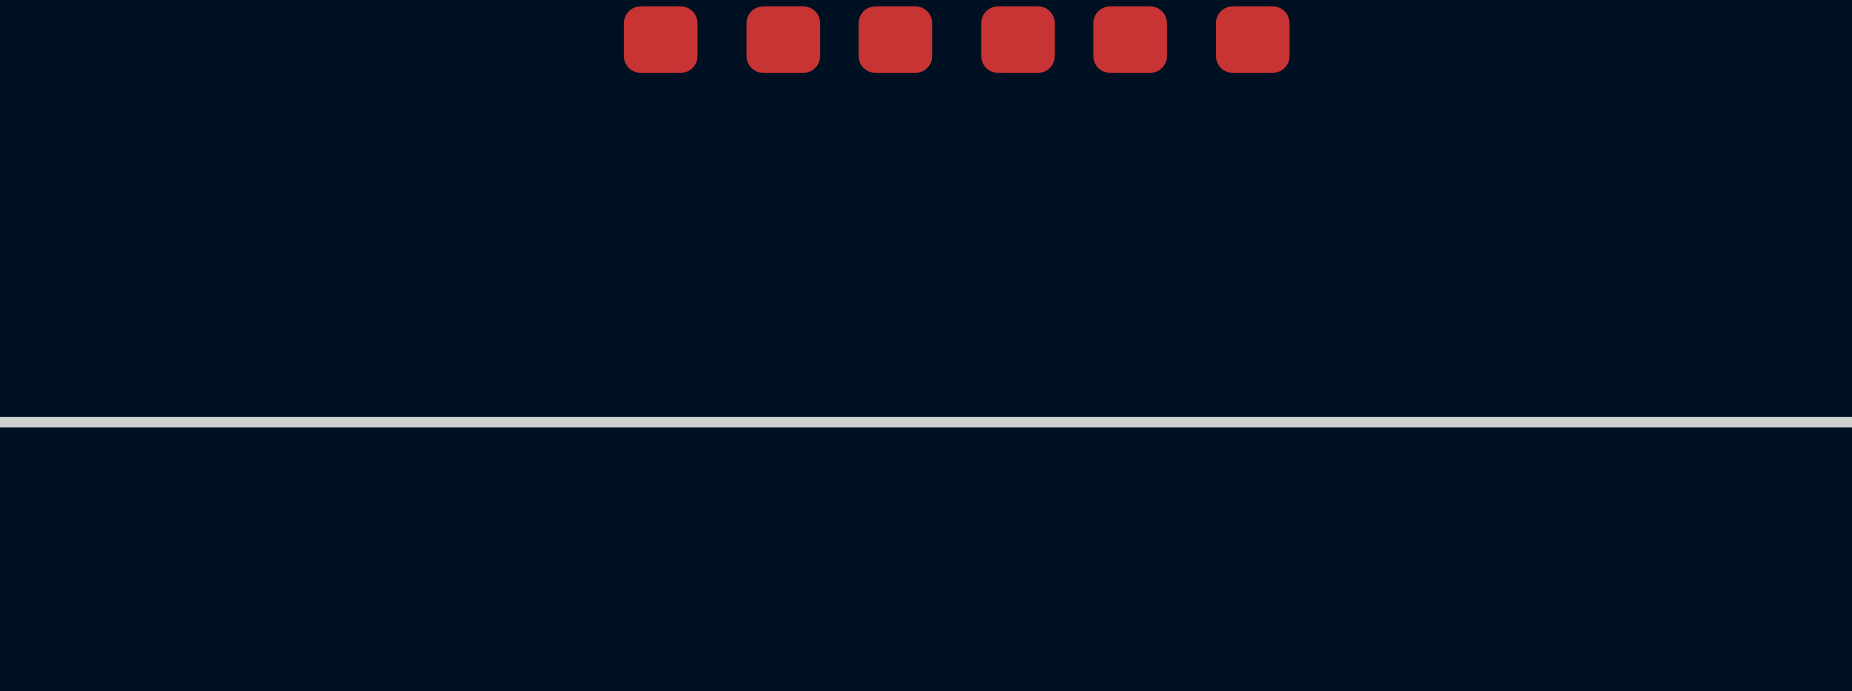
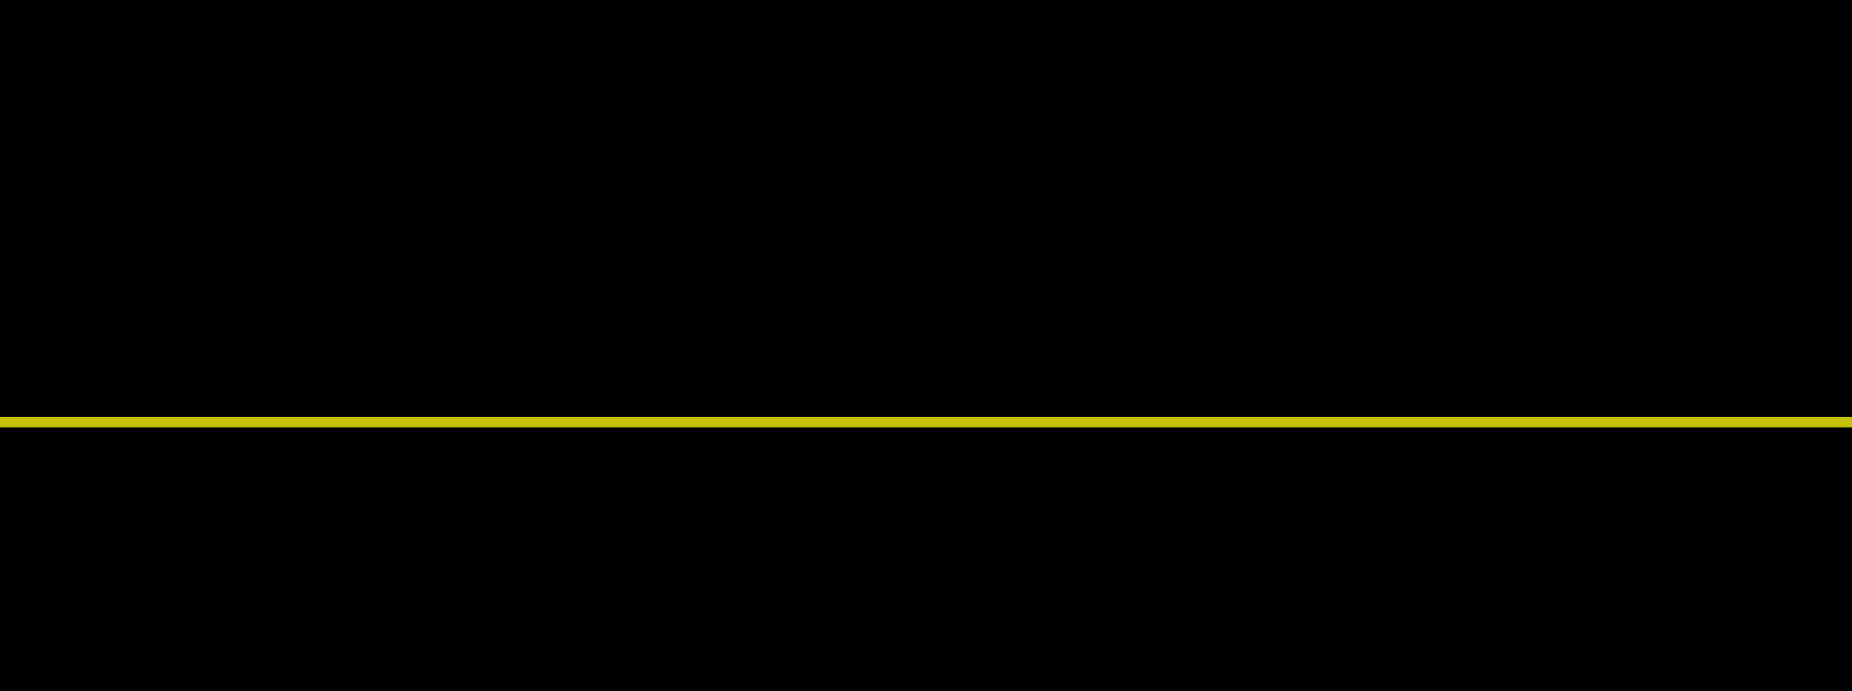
part: (722, 39) -> none
part: (956, 39) -> none
part: (1191, 39) -> none

